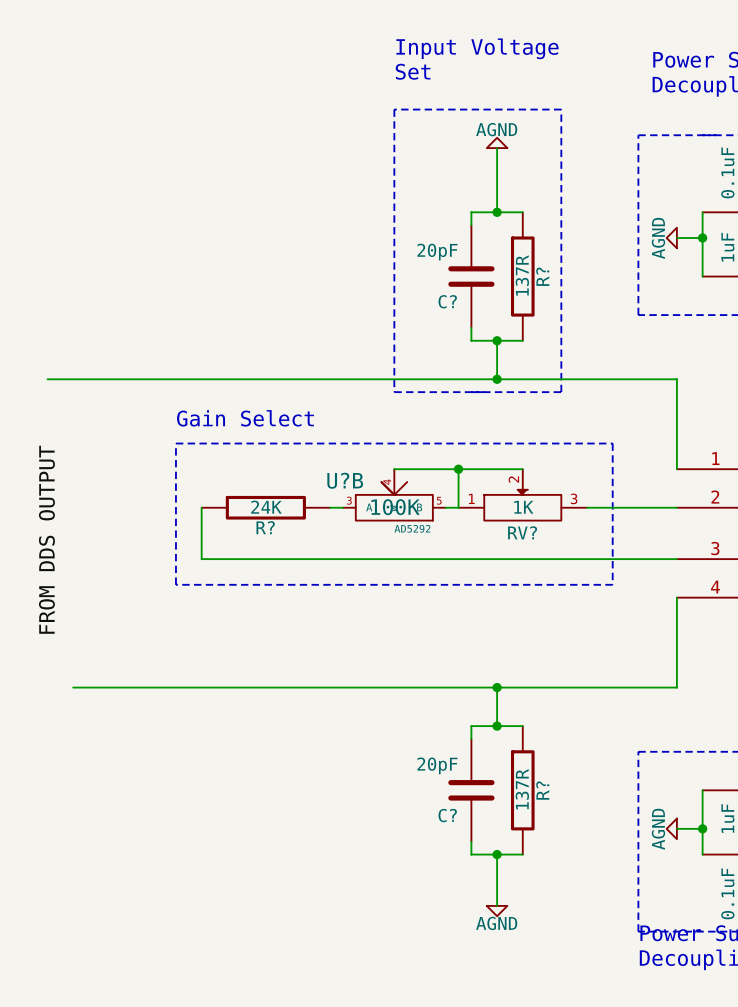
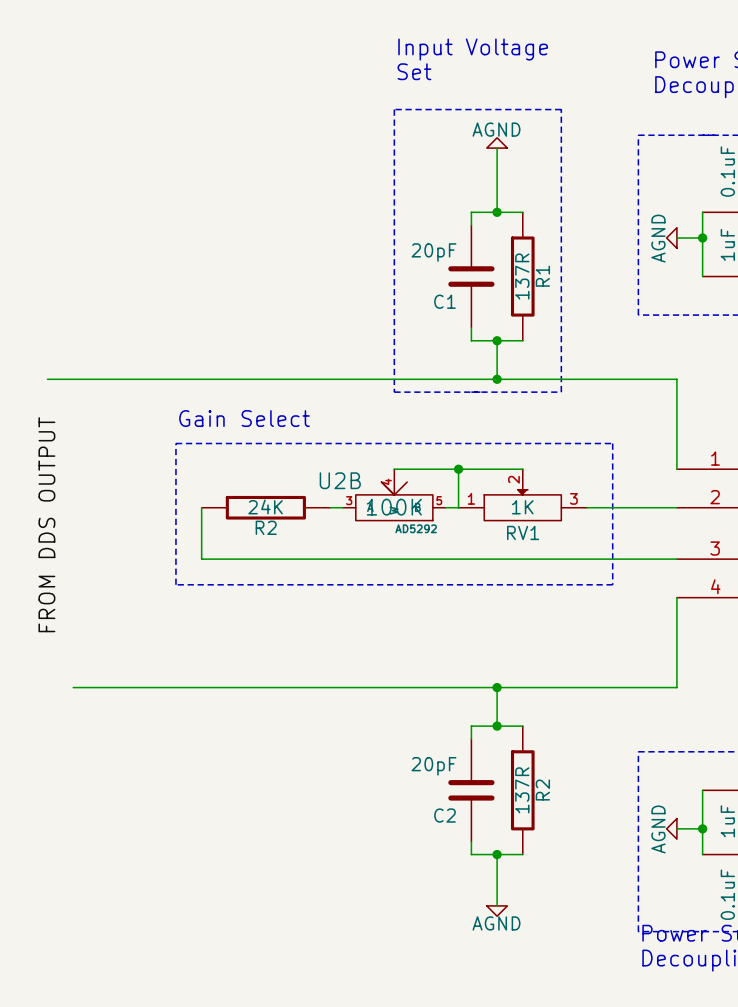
R? name: R? (542, 276) -> R1 (542, 276)
C? name: C? (447, 301) -> C1 (445, 301)
U?B name: U?B (345, 480) -> U2B (340, 480)
R? name: R? (265, 527) -> R2 (266, 527)
RV? name: RV? (522, 532) -> RV1 (523, 532)
R? name: R? (542, 790) -> R2 (542, 790)
C? name: C? (447, 815) -> C2 (445, 815)

